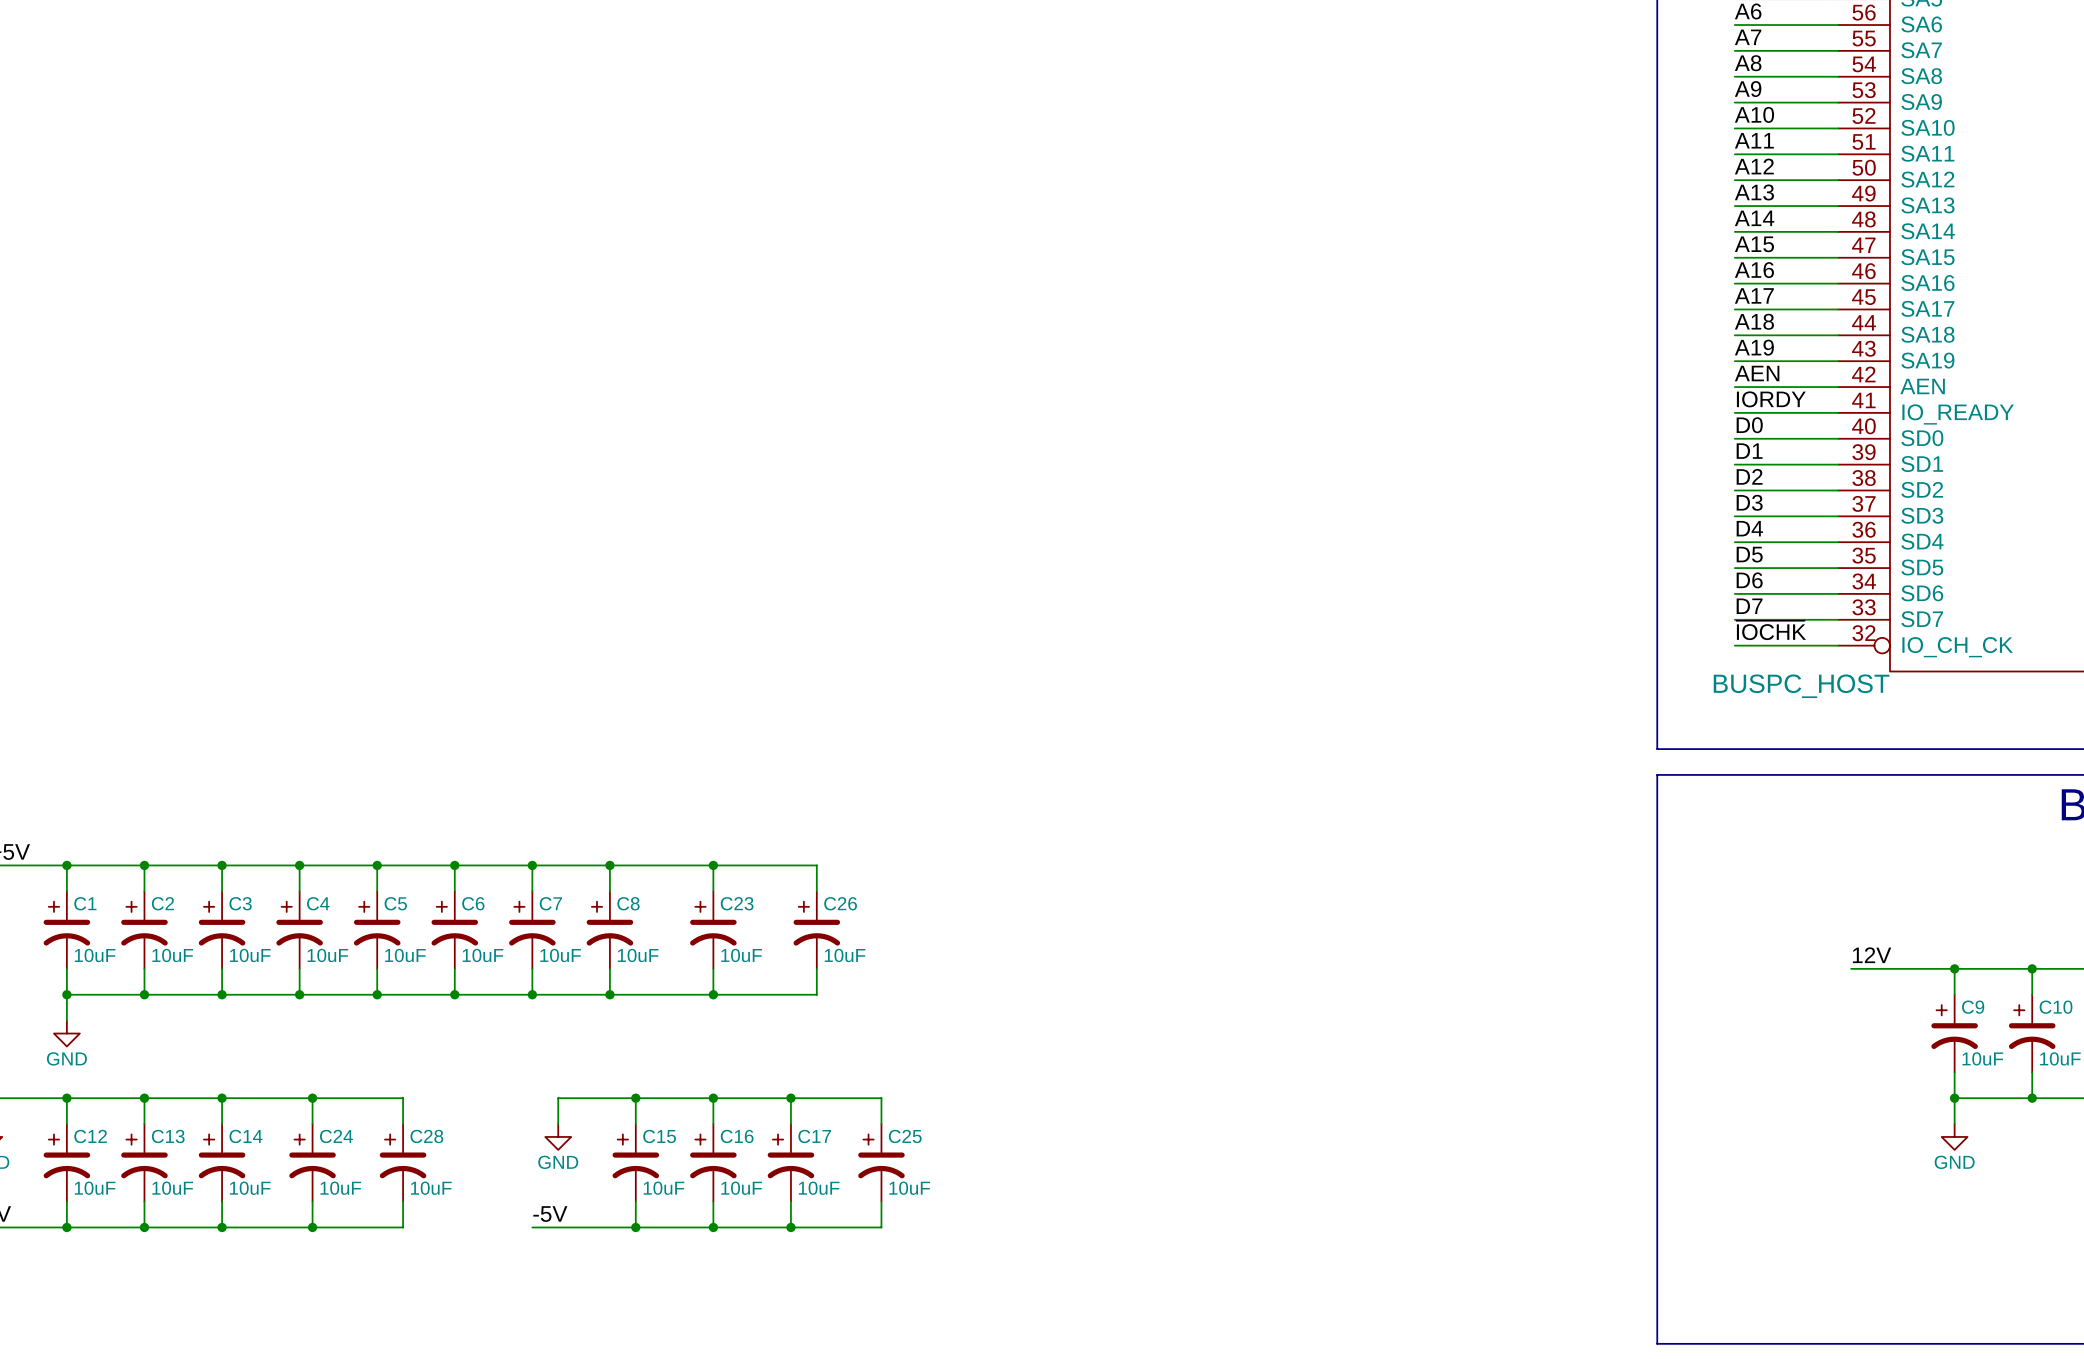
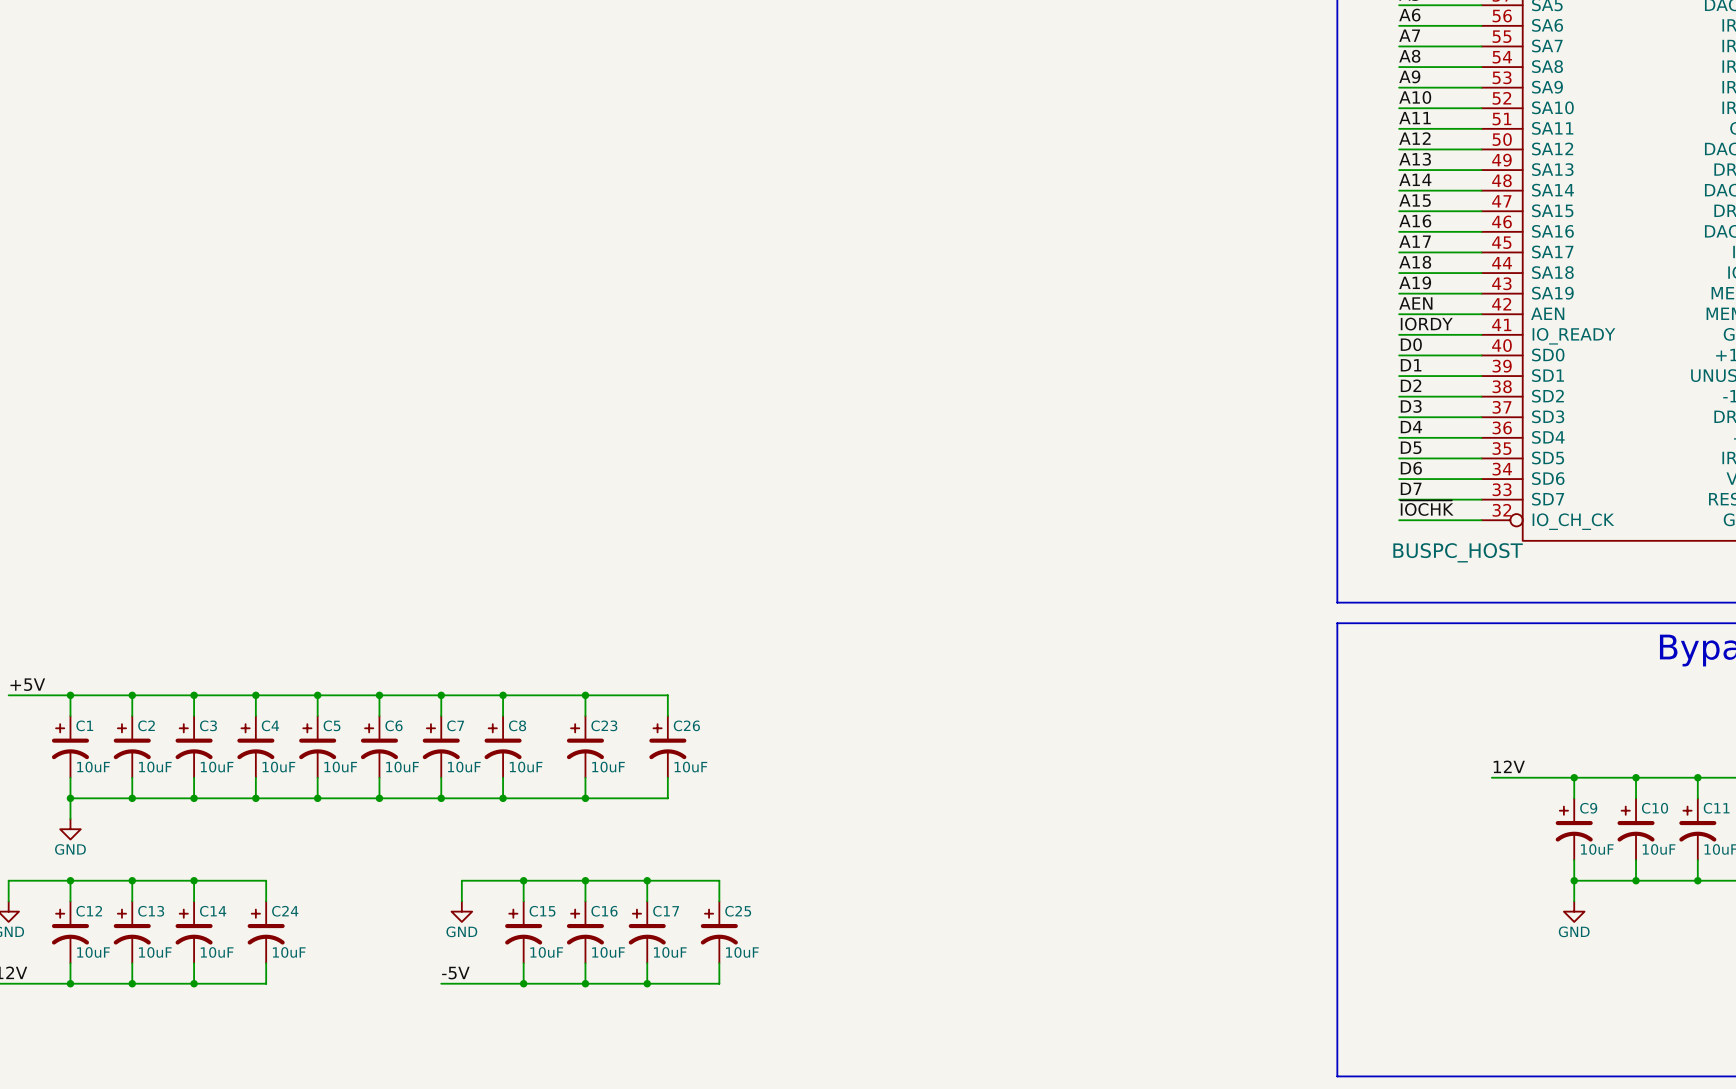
wire: (312, 1098) (403, 1098) (403, 1124) -> none
junction: (312, 1098) -> none
C28: 10uF (403, 1162) -> none
wire: (403, 1201) (403, 1227) (312, 1227) -> none
junction: (312, 1227) -> none

